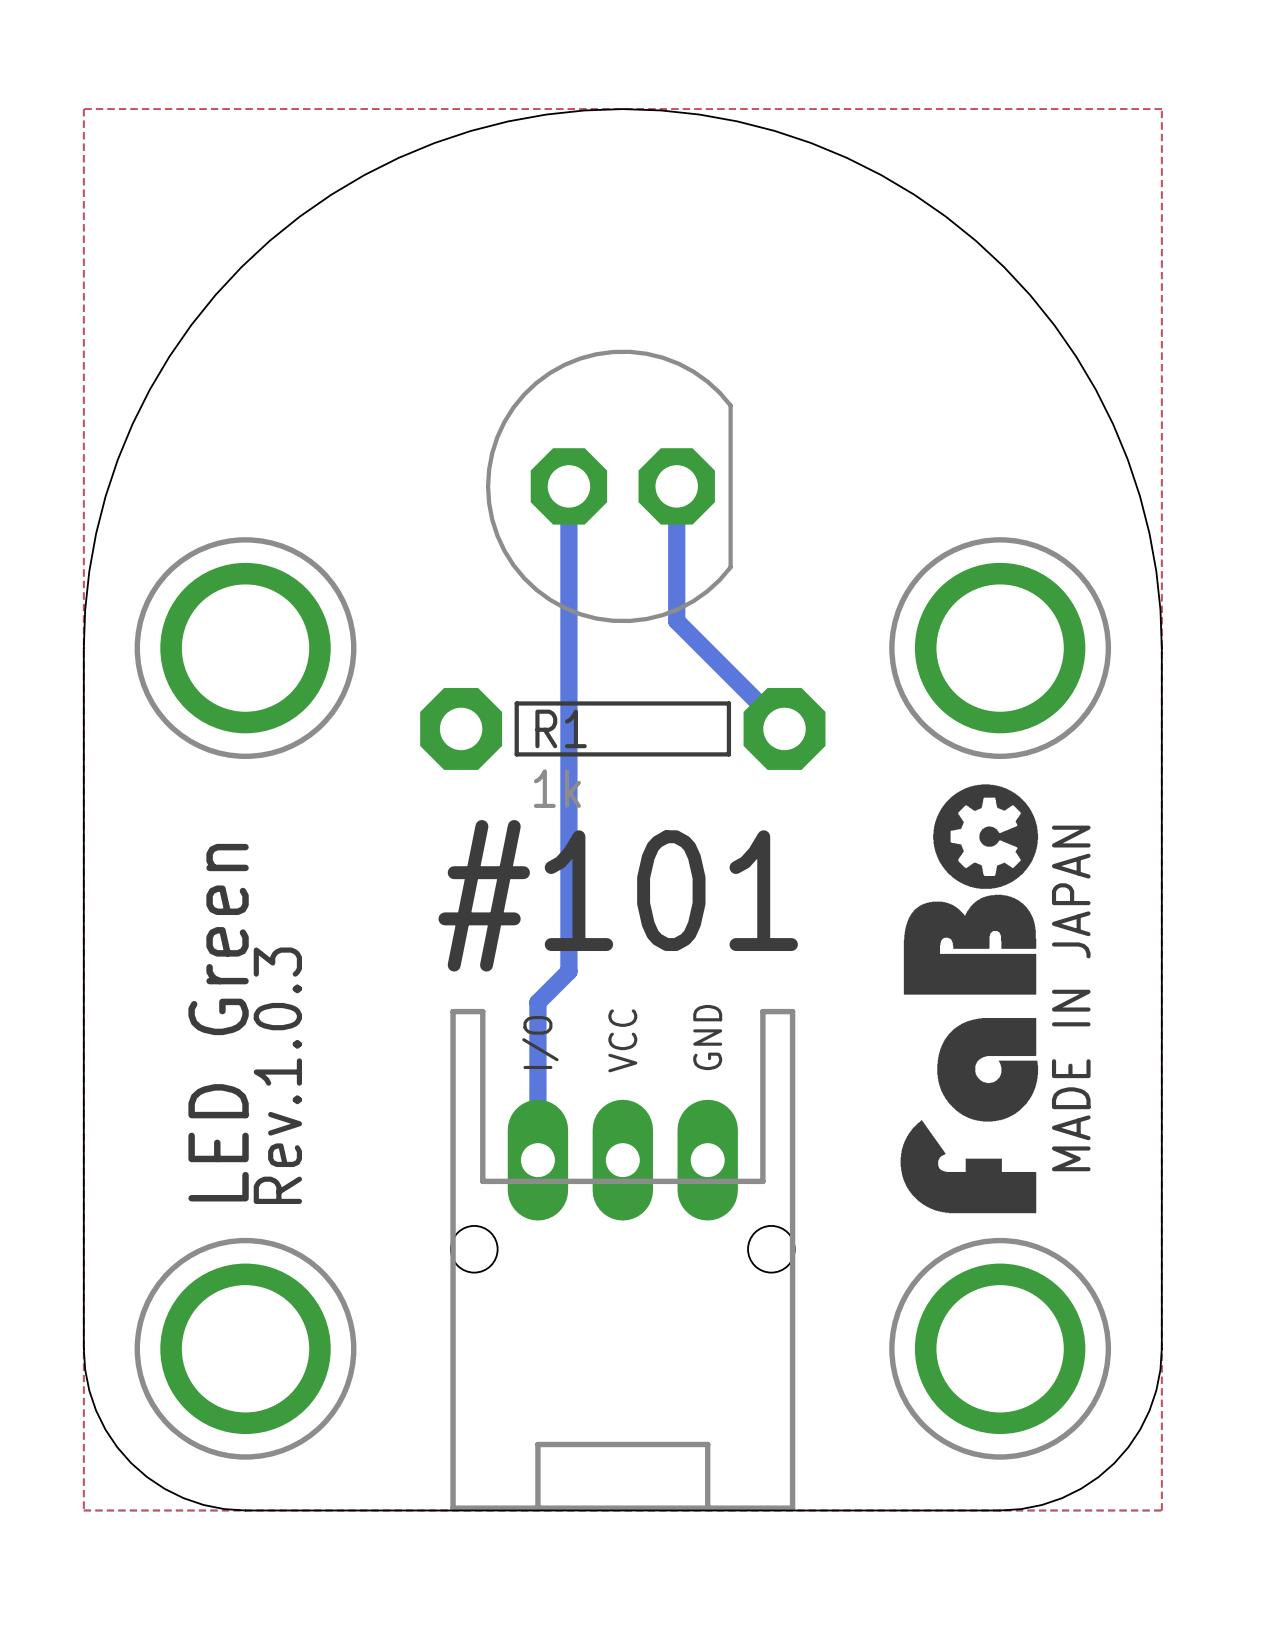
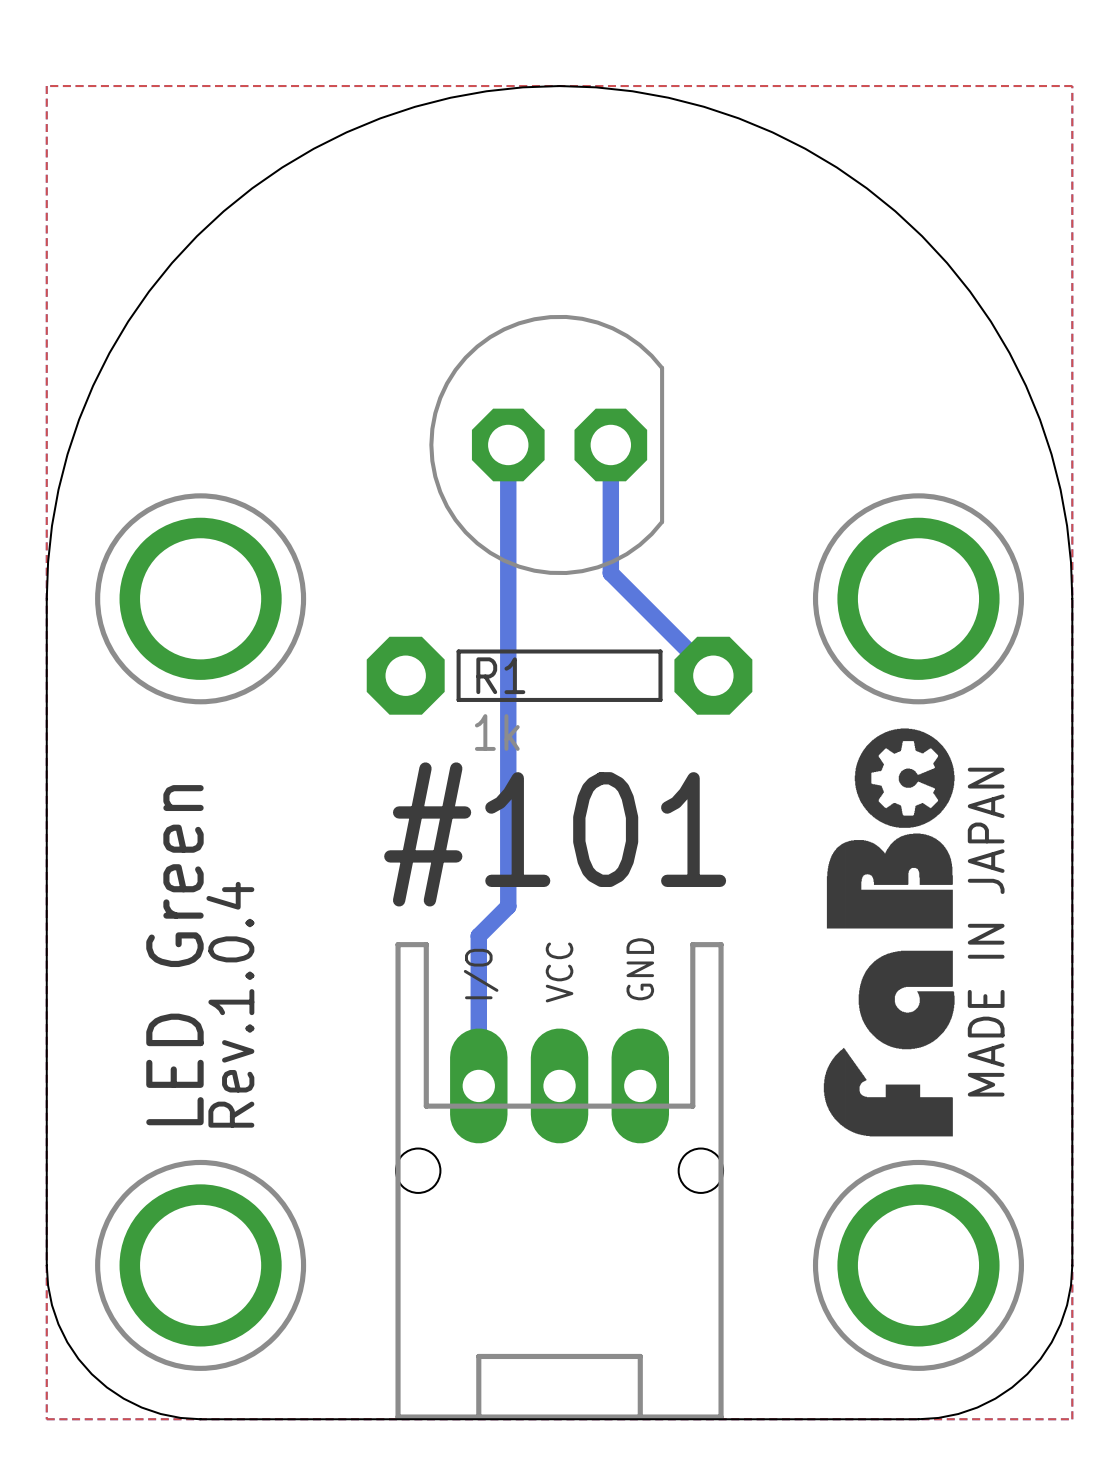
text: Rev.1.0.3 (277, 1075) -> Rev.1.0.4 (230, 1004)

